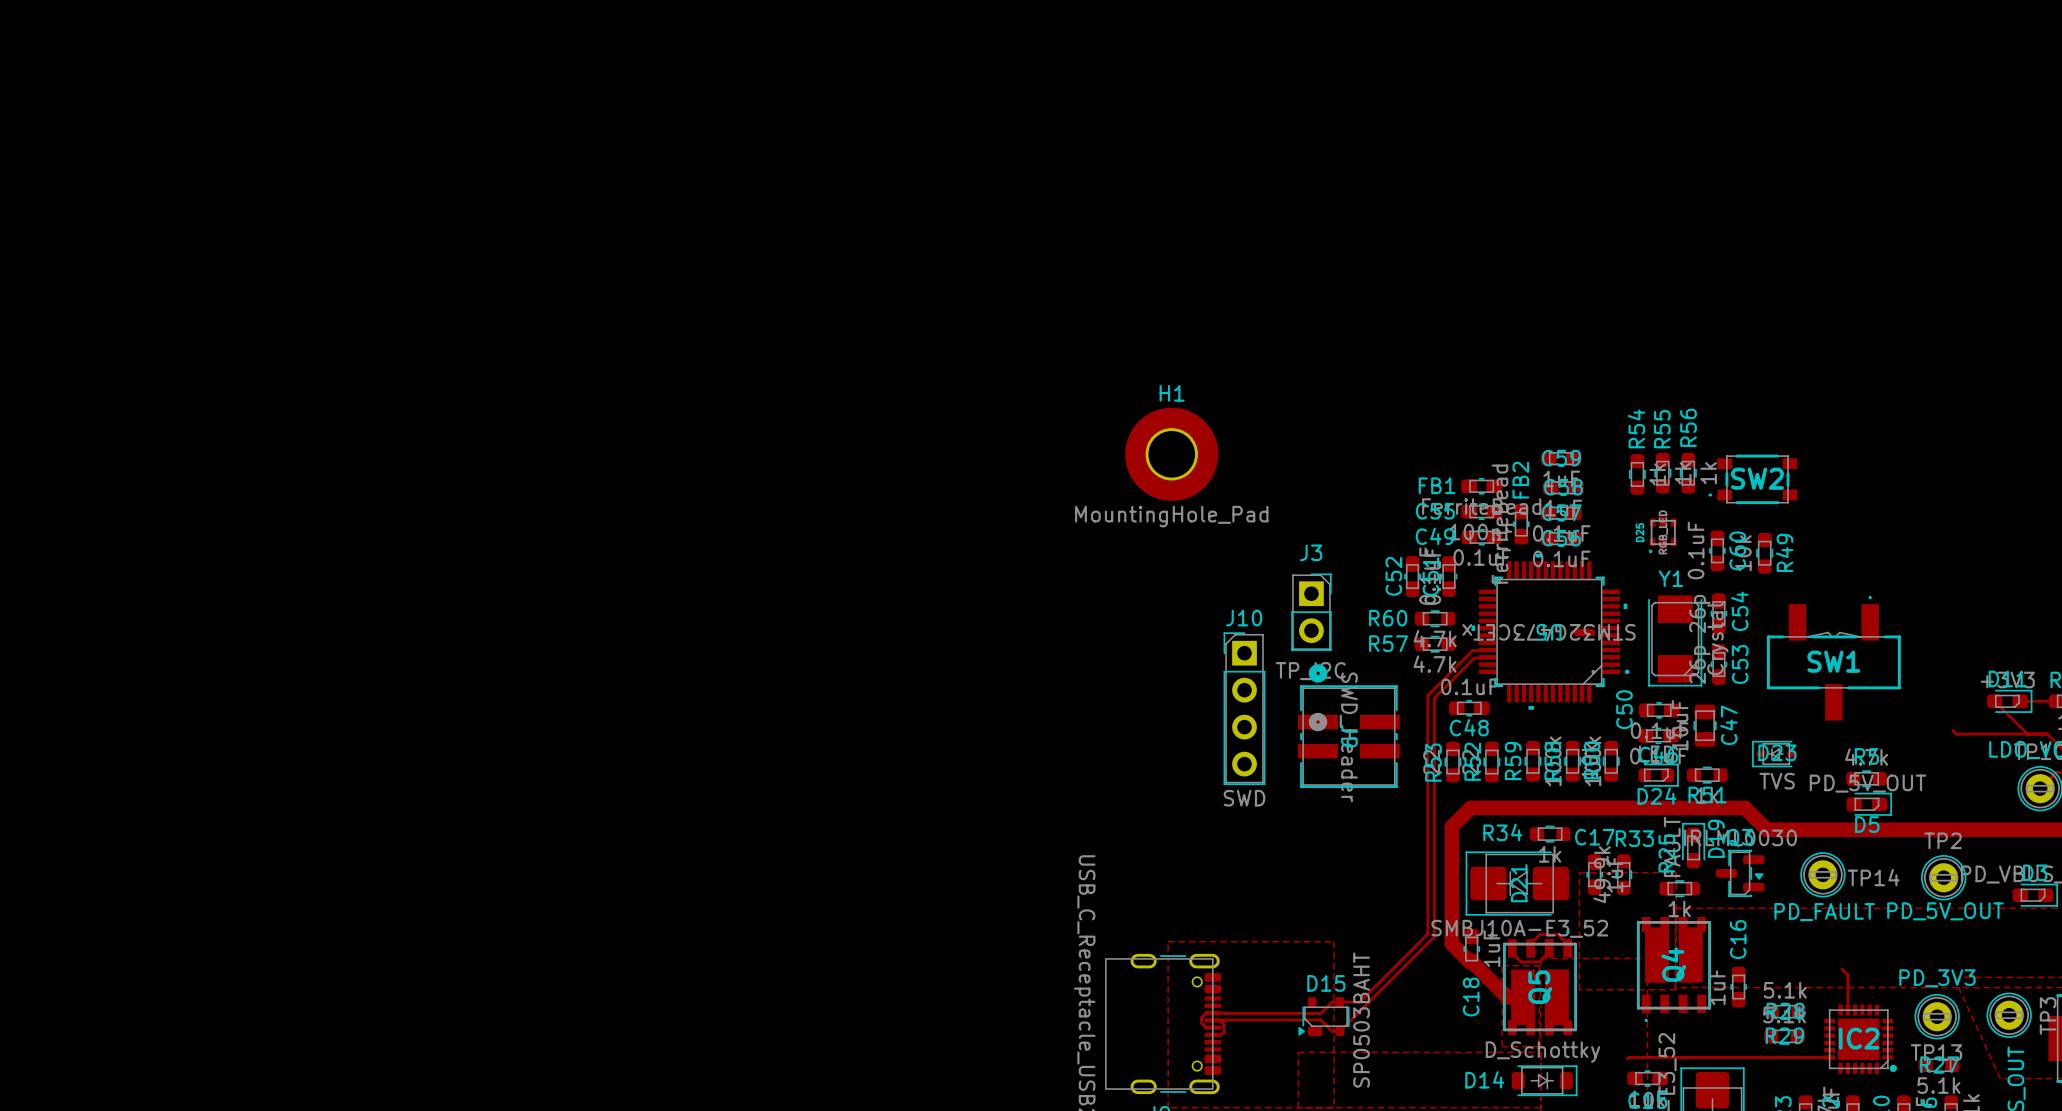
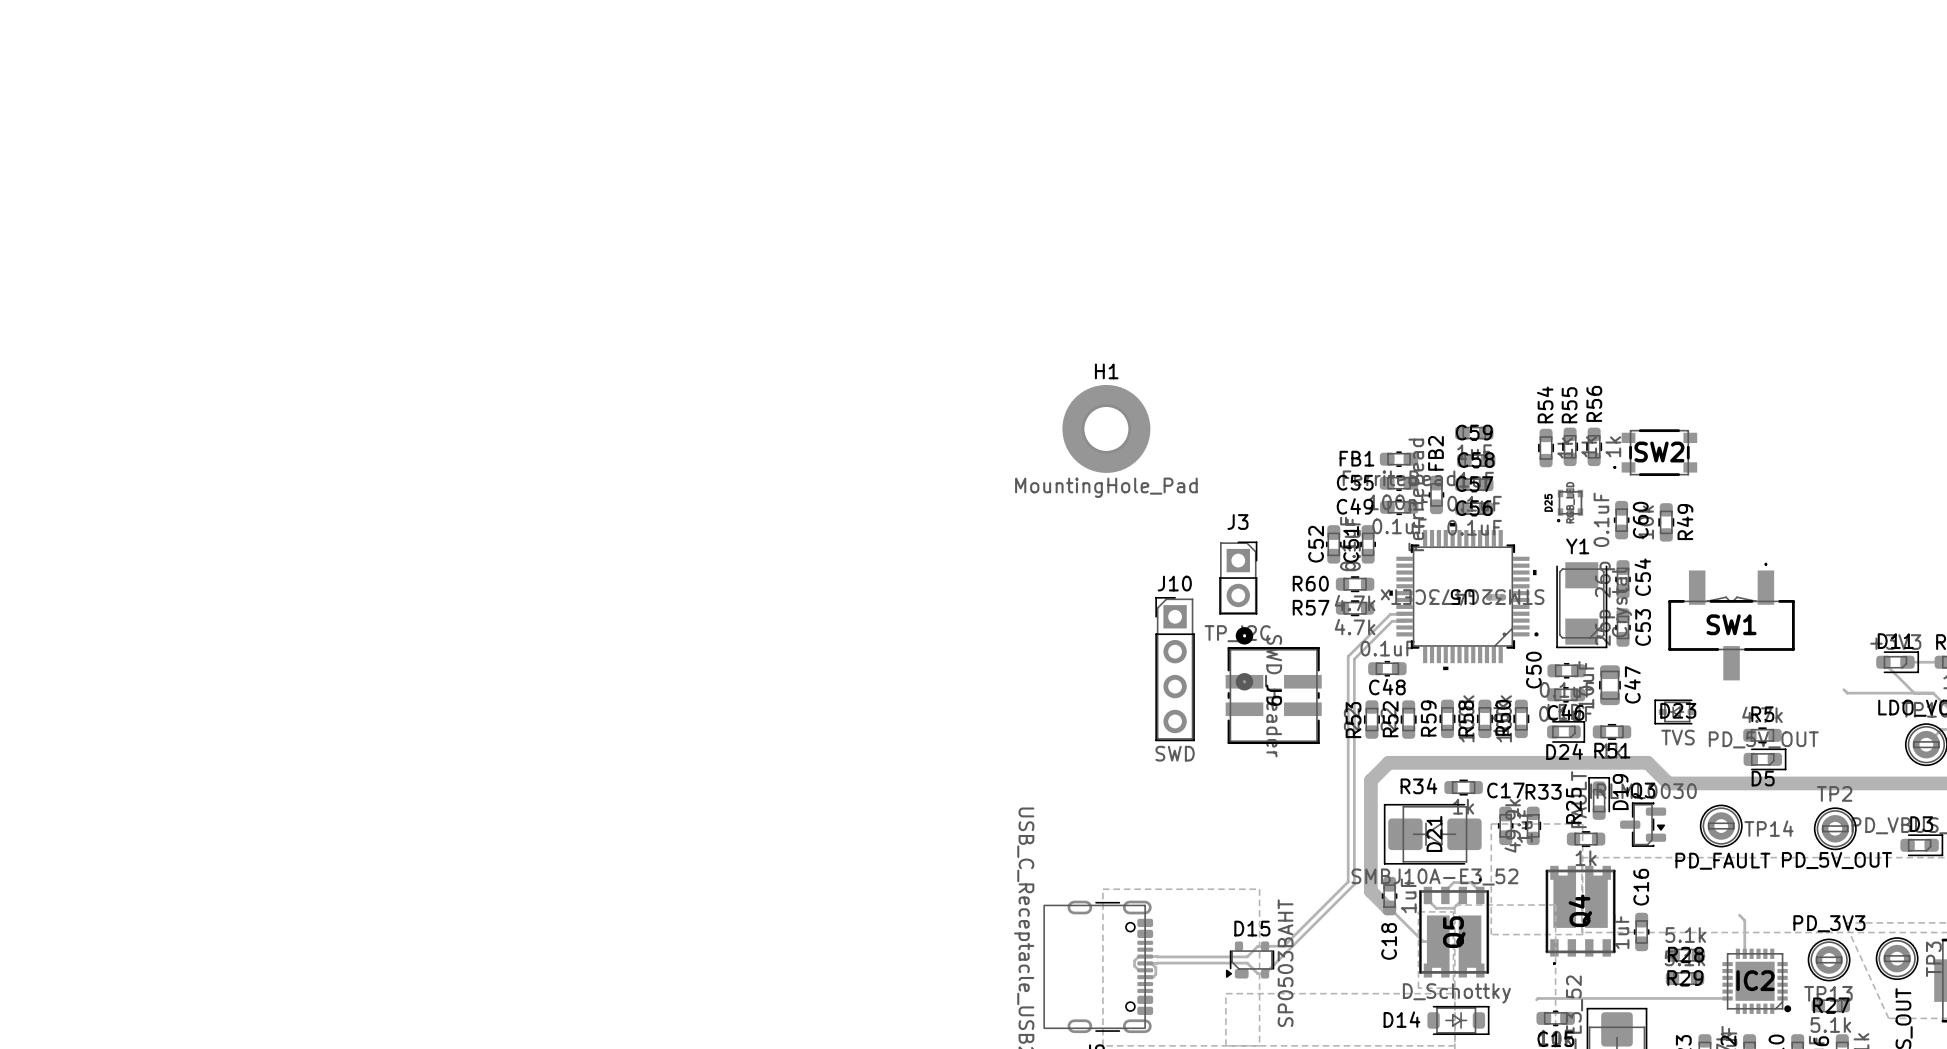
track width: thick (1471, 961) (1507, 997) (1523, 997) -> thin (1389, 907) (1423, 941) (1438, 941)

